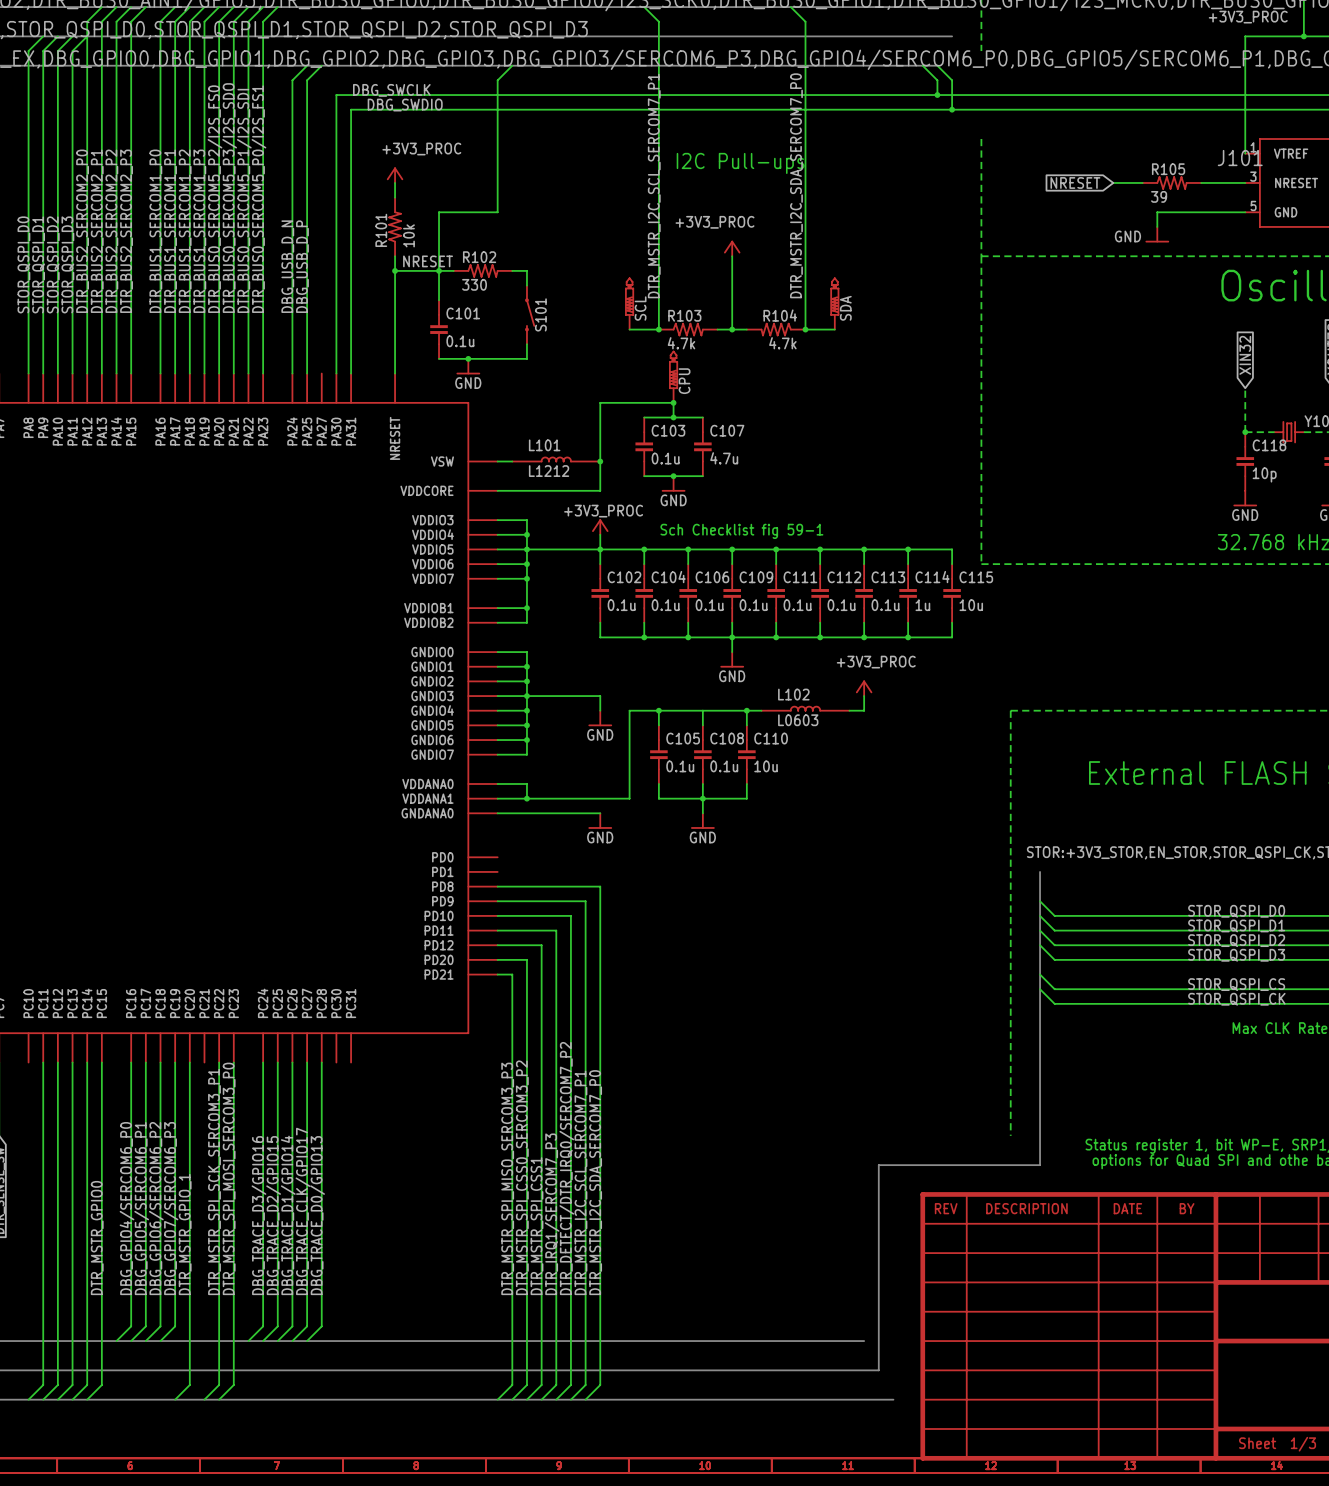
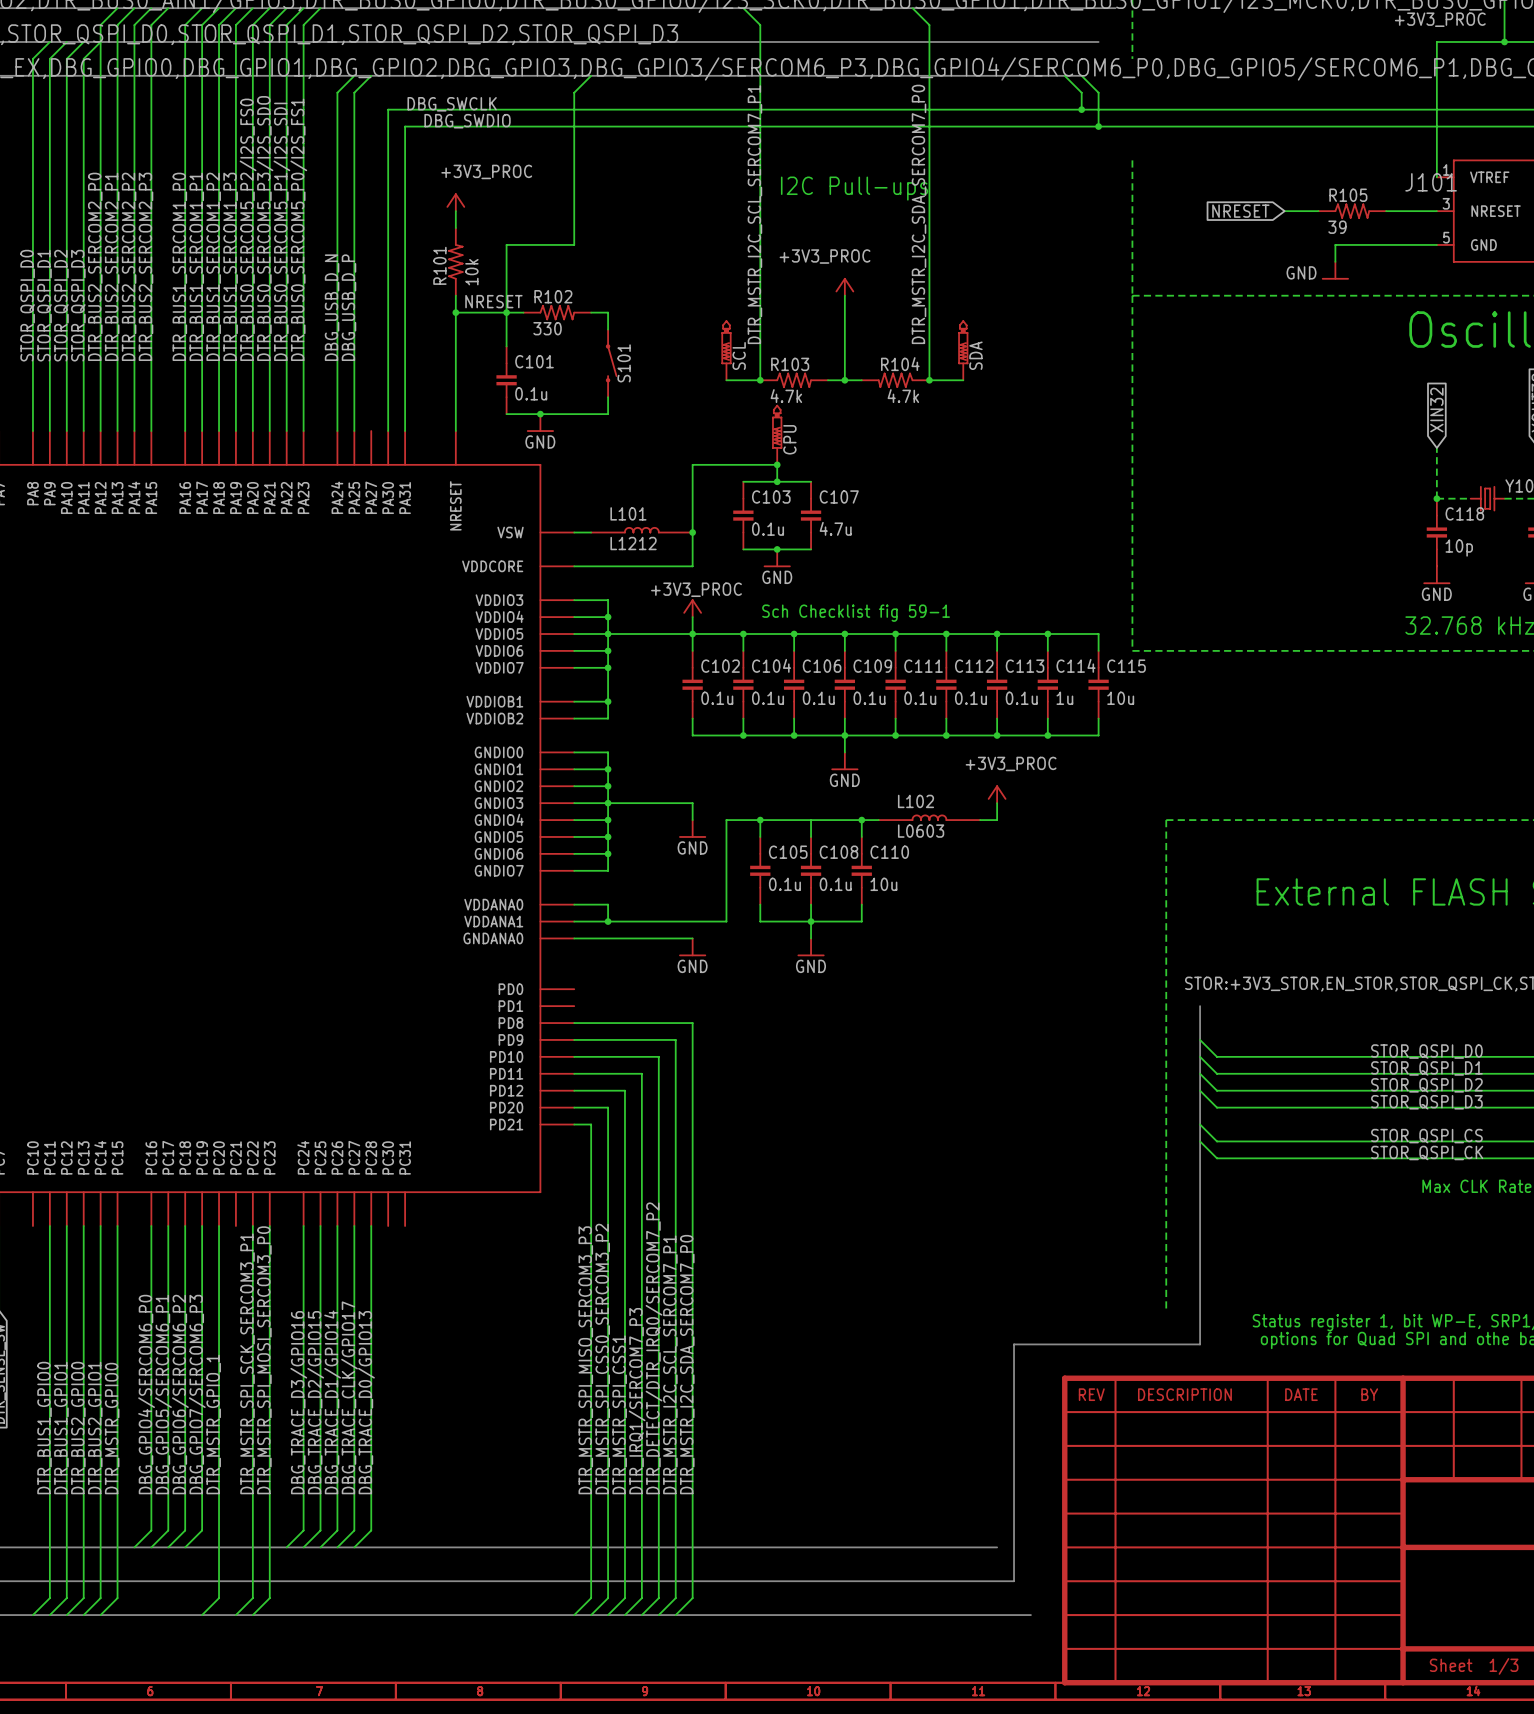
label: none -> DTR_BUS1_GPIO0 (44, 1428)
label: none -> DTR_BUS1_GPIO1 (61, 1428)
label: none -> DTR_BUS2_GPIO0 (78, 1428)
label: none -> DTR_BUS2_GPIO1 (95, 1428)

